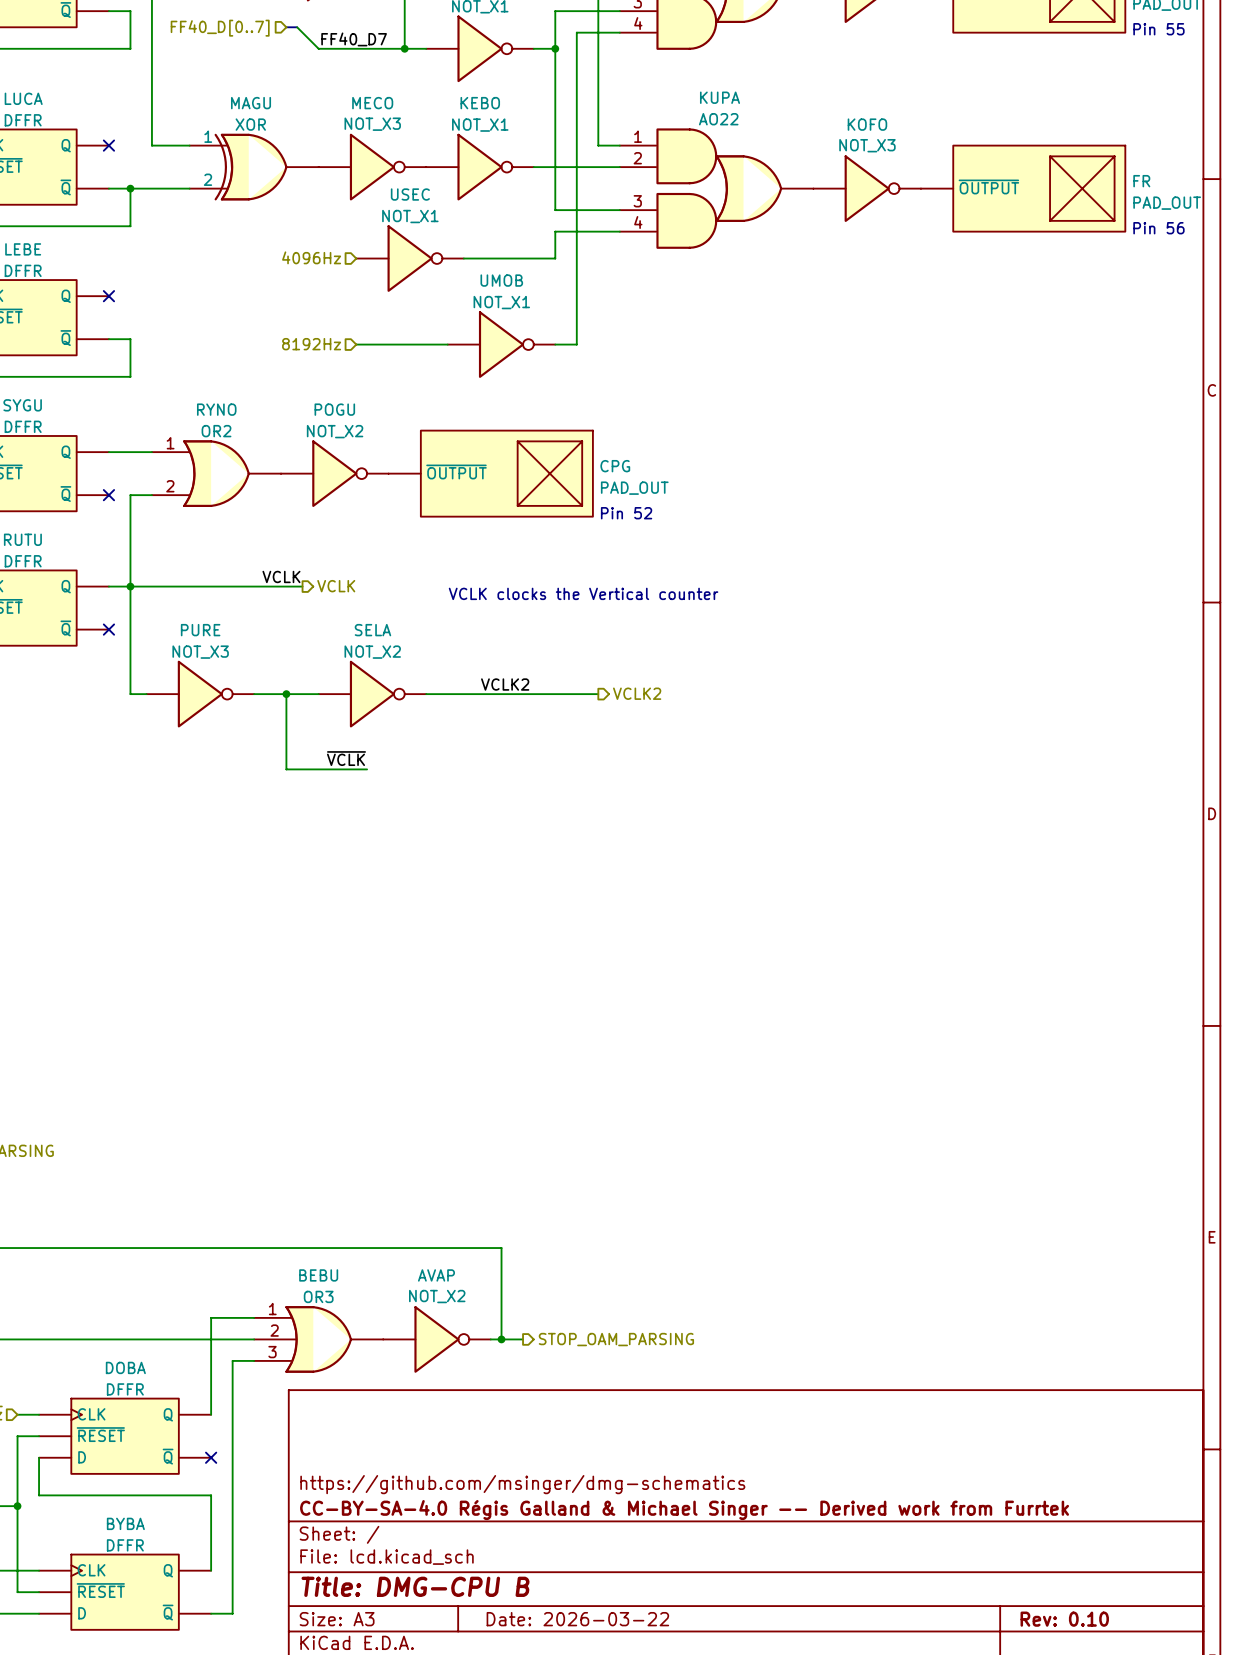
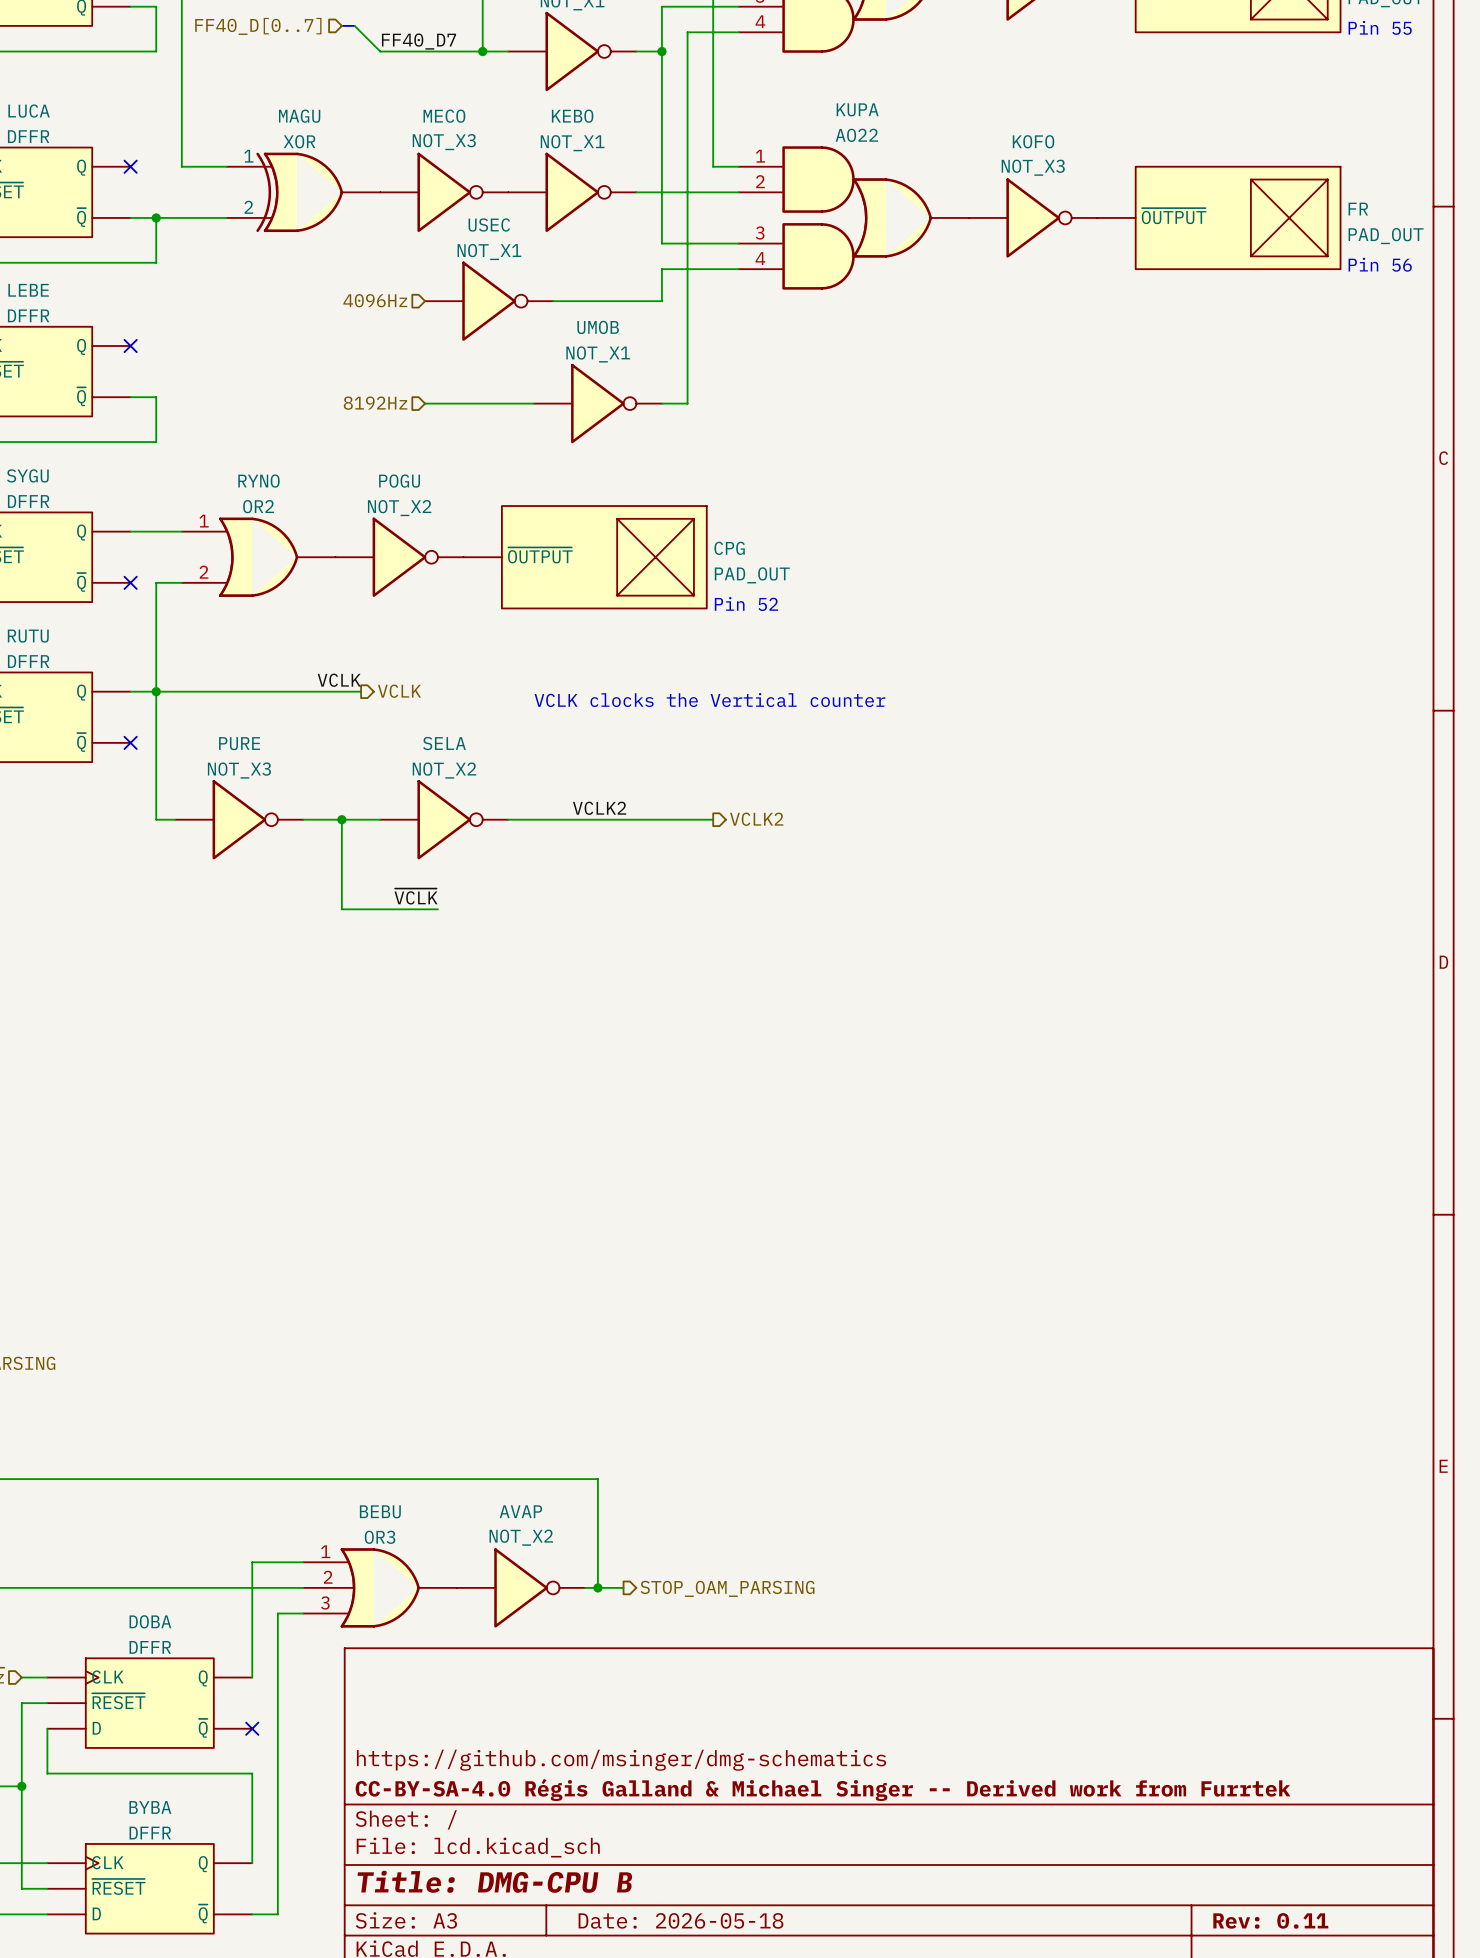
title block: Date: 2026-03-22 (577, 1619) -> Date: 2026-05-18 (681, 1920)
title block: Rev: 0.10 (1064, 1619) -> Rev: 0.11 (1270, 1920)

